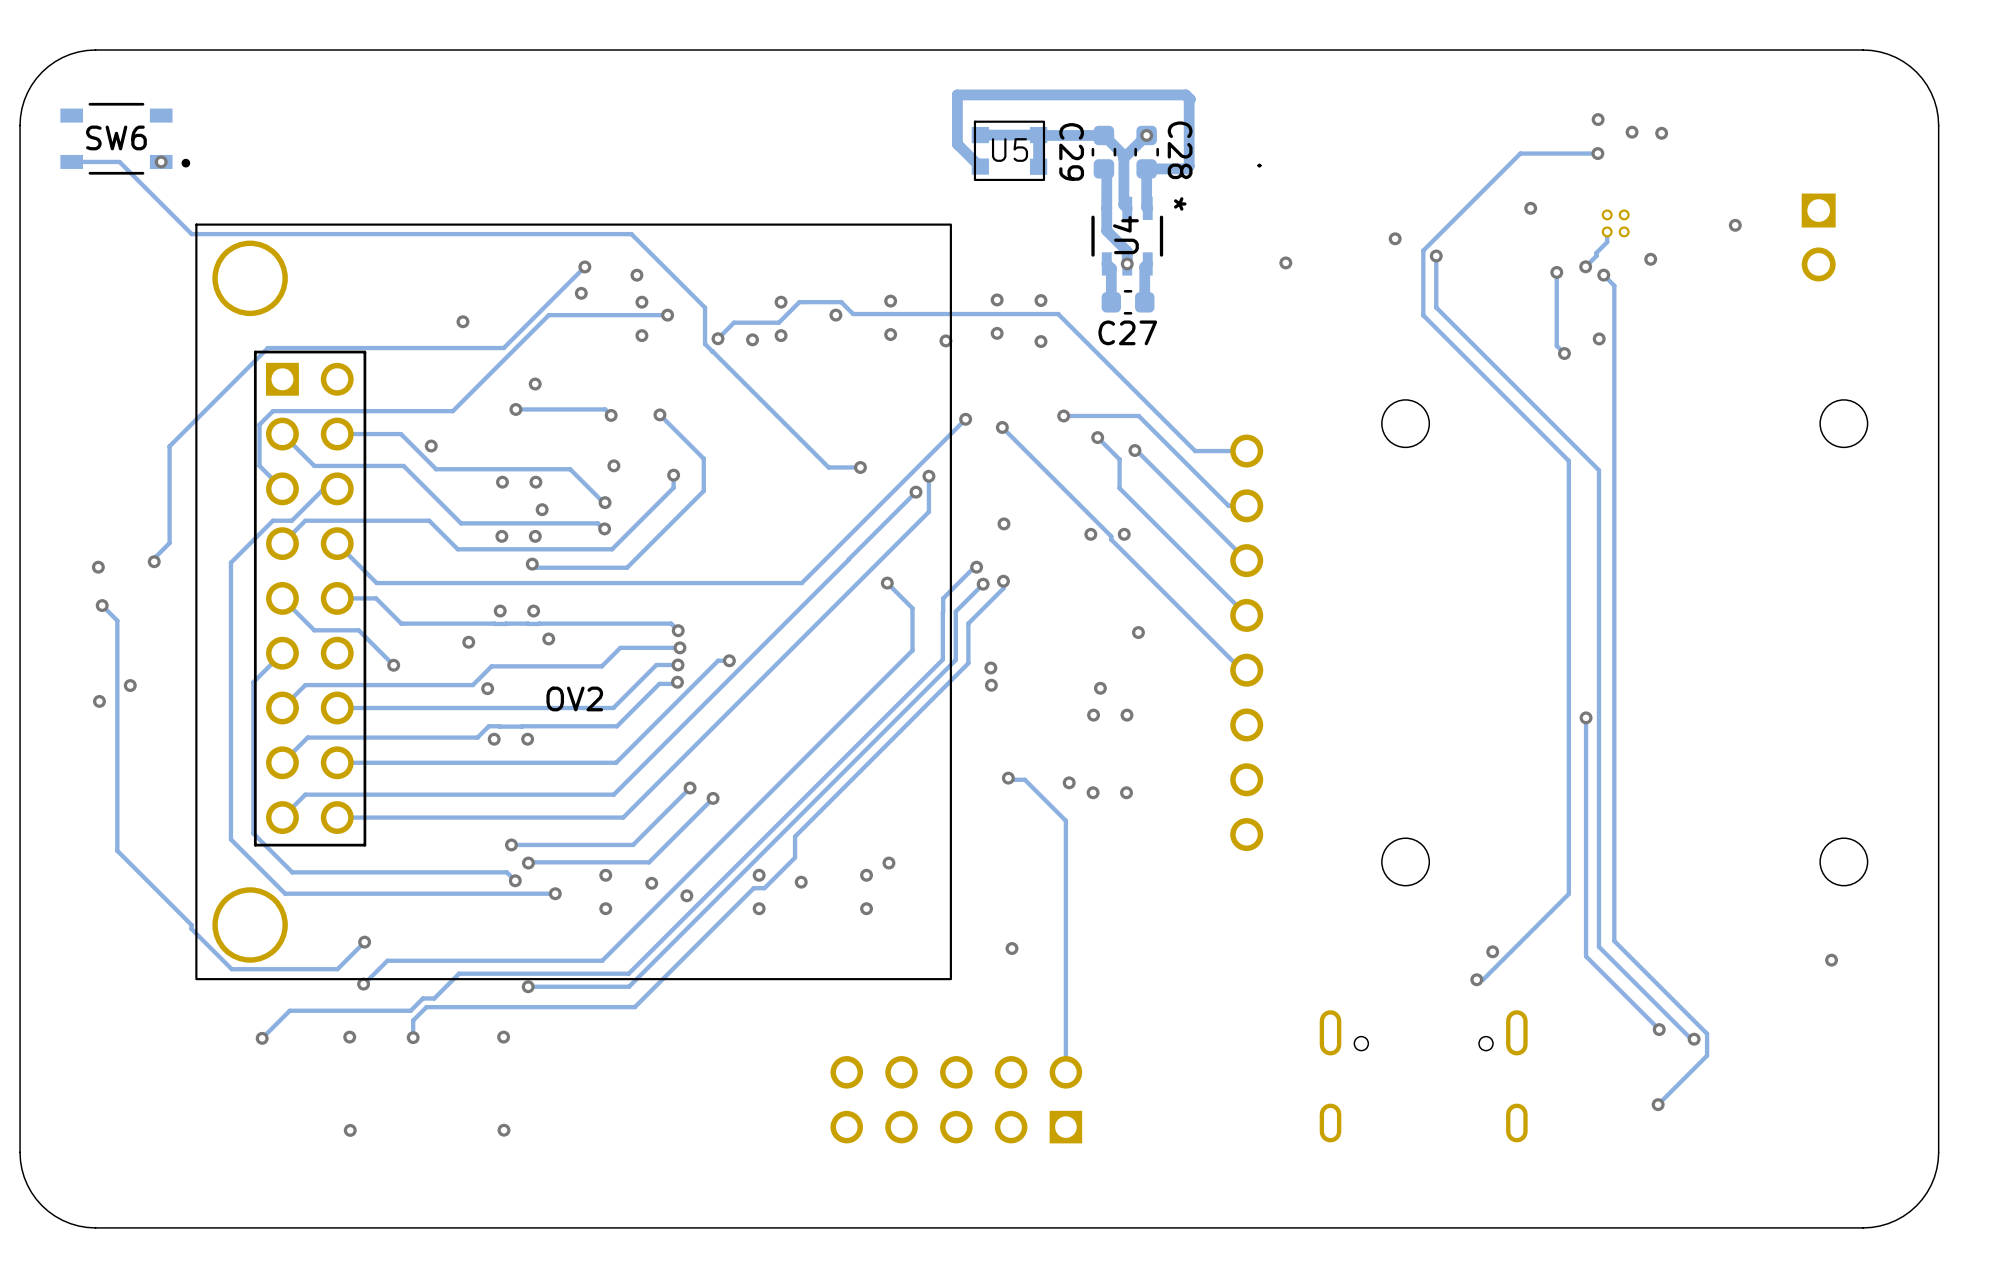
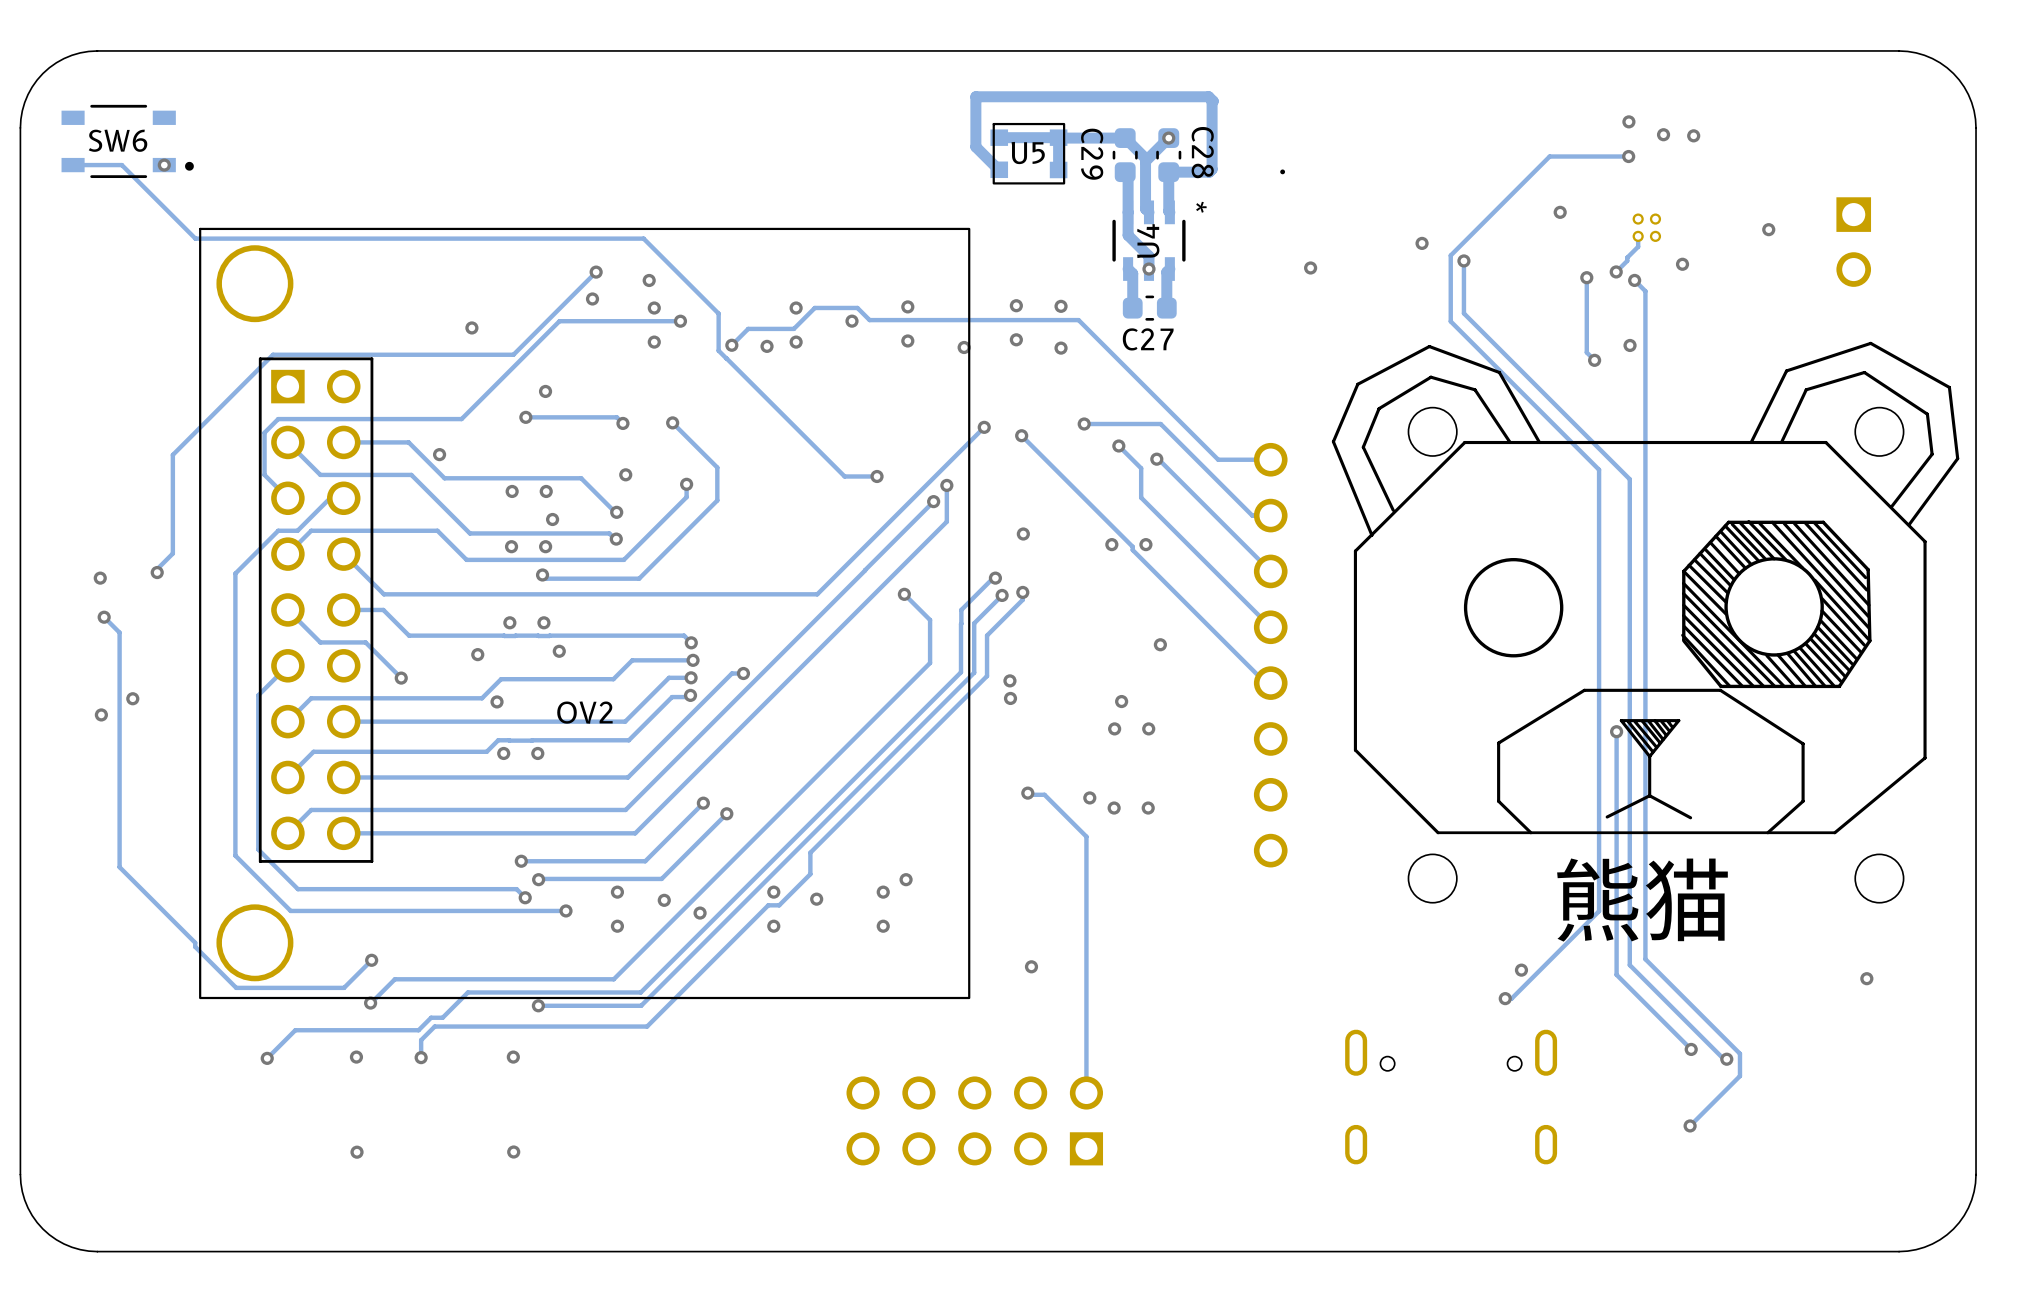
line: none -> (1509, 441) (1475, 389) (1430, 377) (1379, 408) (1363, 447) (1393, 510)
line: none -> (1781, 441) (1806, 389) (1864, 372) (1927, 414) (1932, 454) (1891, 506)
line: none -> (1539, 442) (1499, 372) (1429, 346) (1357, 384) (1333, 441) (1371, 535)
line: none -> (1751, 442) (1786, 370) (1870, 343) (1949, 387) (1957, 458) (1909, 523)
line: none -> (1825, 442) (1925, 541) (1925, 757) (1834, 832) (1438, 832) (1355, 750) (1355, 551) (1464, 442) (1825, 442)
line: none -> (1748, 521) (1785, 559)
line: none -> (1740, 522) (1774, 558)
line: none -> (1772, 522) (1869, 628)
line: none -> (1759, 523) (1802, 567)
line: none -> (1784, 523) (1868, 616)
line: none -> (1794, 523) (1869, 605)
line: none -> (1805, 523) (1866, 590)
line: none -> (1814, 522) (1865, 577)
line: none -> (1732, 524) (1765, 558)
line: none -> (1725, 525) (1758, 560)
line: none -> (1721, 532) (1751, 564)
line: none -> (1715, 536) (1745, 568)
line: none -> (1710, 542) (1739, 573)
line: none -> (1706, 550) (1733, 579)
line: none -> (1700, 553) (1730, 585)
drawing: none -> [1724, 557, 1824, 657]
drawing: none -> [1463, 557, 1564, 658]
line: none -> (1694, 559) (1727, 592)
line: none -> (1689, 565) (1726, 602)
line: none -> (1683, 571) (1725, 614)
line: none -> (1683, 571) (1728, 522) (1823, 522) (1868, 569) (1869, 640)
line: none -> (1683, 571) (1683, 639)
line: none -> (1814, 580) (1869, 640)
line: none -> (1683, 583) (1784, 686)
line: none -> (1683, 593) (1774, 686)
line: none -> (1822, 598) (1864, 645)
line: none -> (1683, 605) (1763, 686)
line: none -> (1821, 610) (1861, 652)
line: none -> (1683, 615) (1753, 686)
line: none -> (1820, 620) (1856, 658)
line: none -> (1684, 626) (1742, 686)
line: none -> (1817, 627) (1851, 663)
line: none -> (1814, 633) (1849, 670)
line: none -> (1682, 635) (1729, 686)
line: none -> (1810, 639) (1845, 676)
line: none -> (1869, 640) (1839, 686) (1720, 686) (1683, 640)
line: none -> (1805, 643) (1841, 681)
line: none -> (1799, 647) (1833, 685)
line: none -> (1794, 650) (1825, 686)
line: none -> (1788, 654) (1815, 686)
line: none -> (1777, 654) (1805, 686)
line: none -> (1766, 655) (1794, 686)
line: none -> (1642, 721) (1659, 742)
line: none -> (1648, 721) (1663, 739)
line: none -> (1655, 721) (1666, 734)
line: none -> (1668, 721) (1672, 726)
line: none -> (1628, 721) (1652, 751)
line: none -> (1635, 721) (1656, 746)
line: none -> (1661, 721) (1668, 730)
line: none -> (1649, 756) (1678, 720) (1621, 720) (1649, 756)
line: none -> (1649, 756) (1649, 795)
line: none -> (1649, 795) (1690, 817)
line: none -> (1649, 795) (1607, 817)
line: none -> (1767, 832) (1803, 801) (1803, 743) (1720, 690) (1584, 690) (1498, 743) (1498, 801) (1530, 832)
text: none -> 熊猫 (1642, 900)

